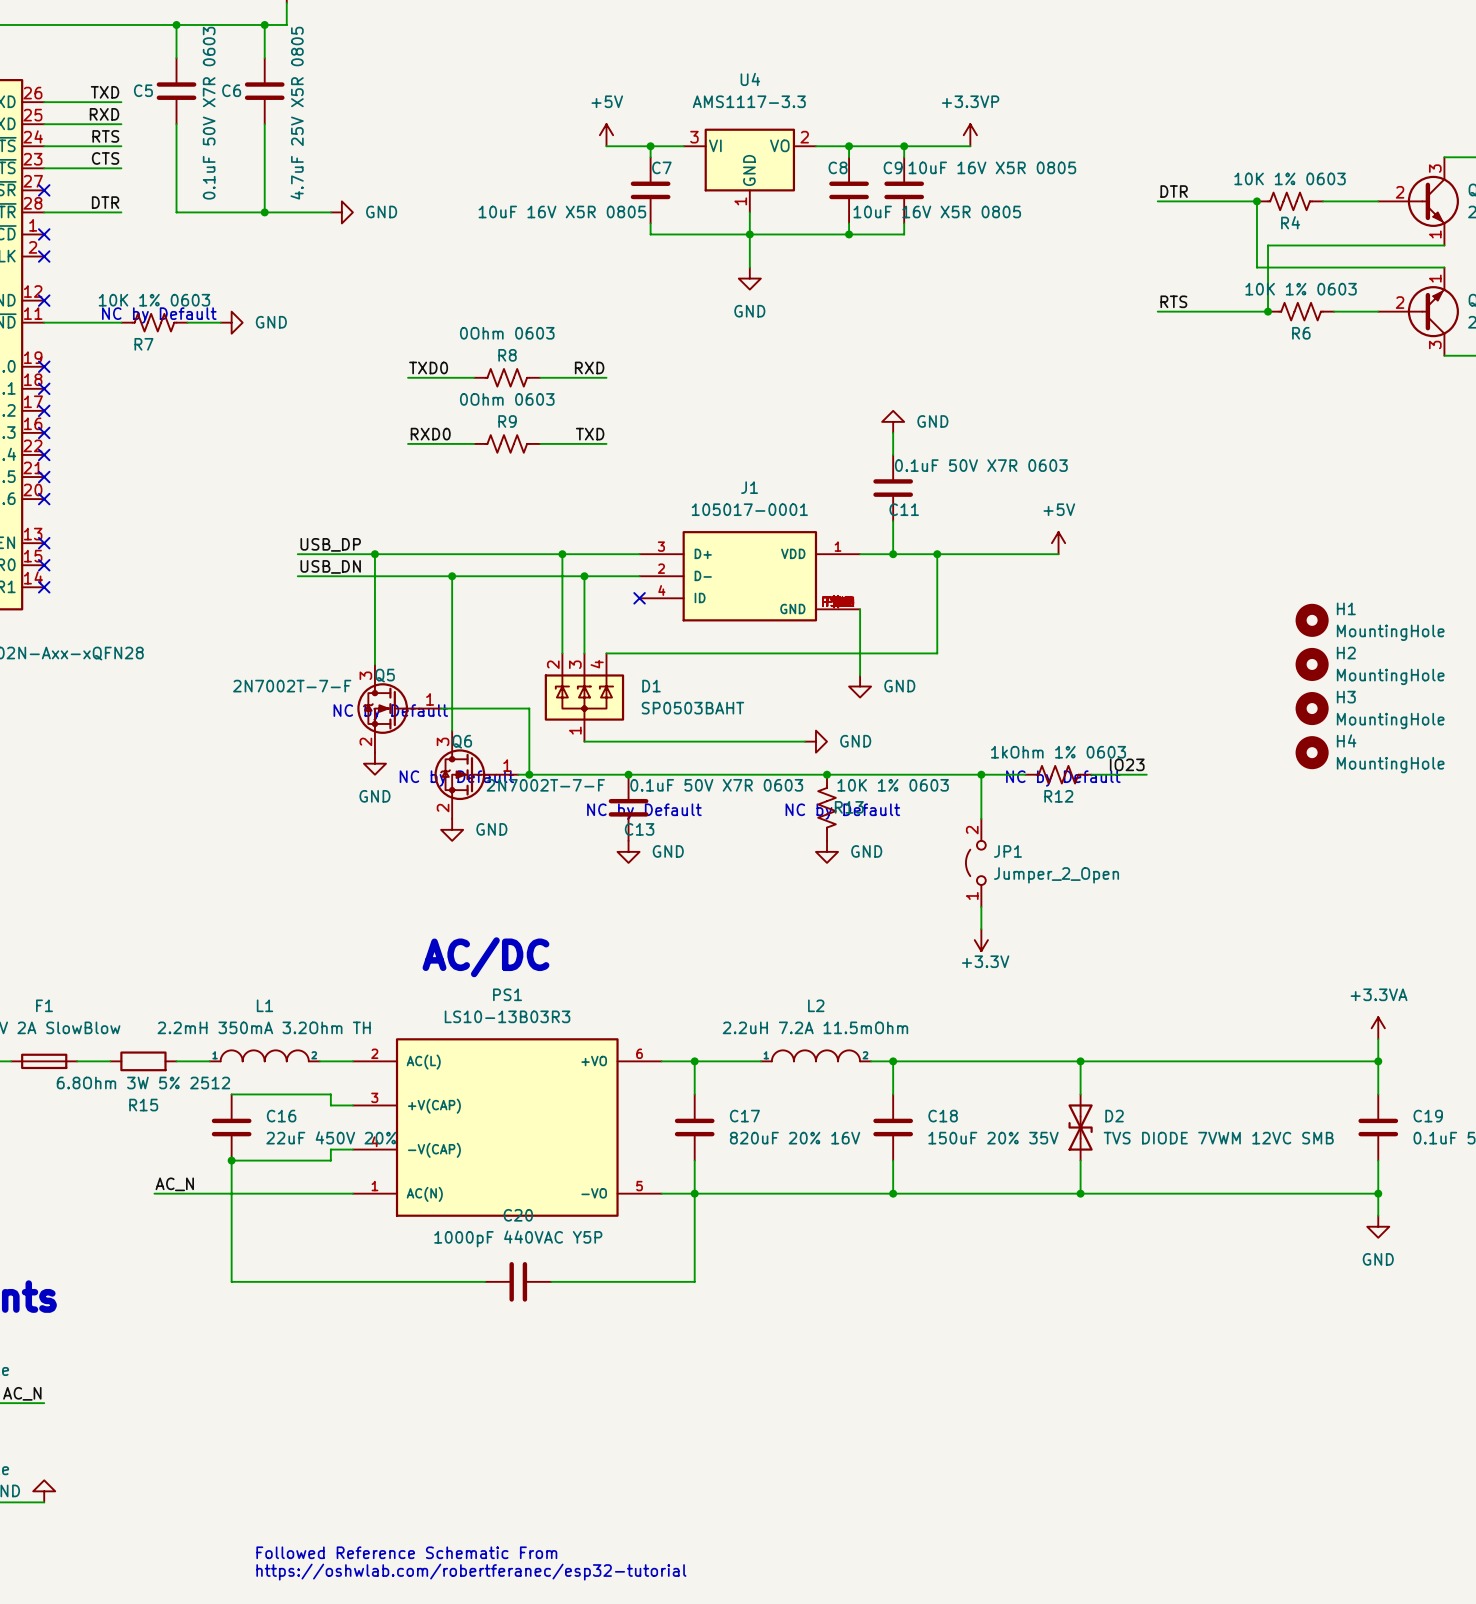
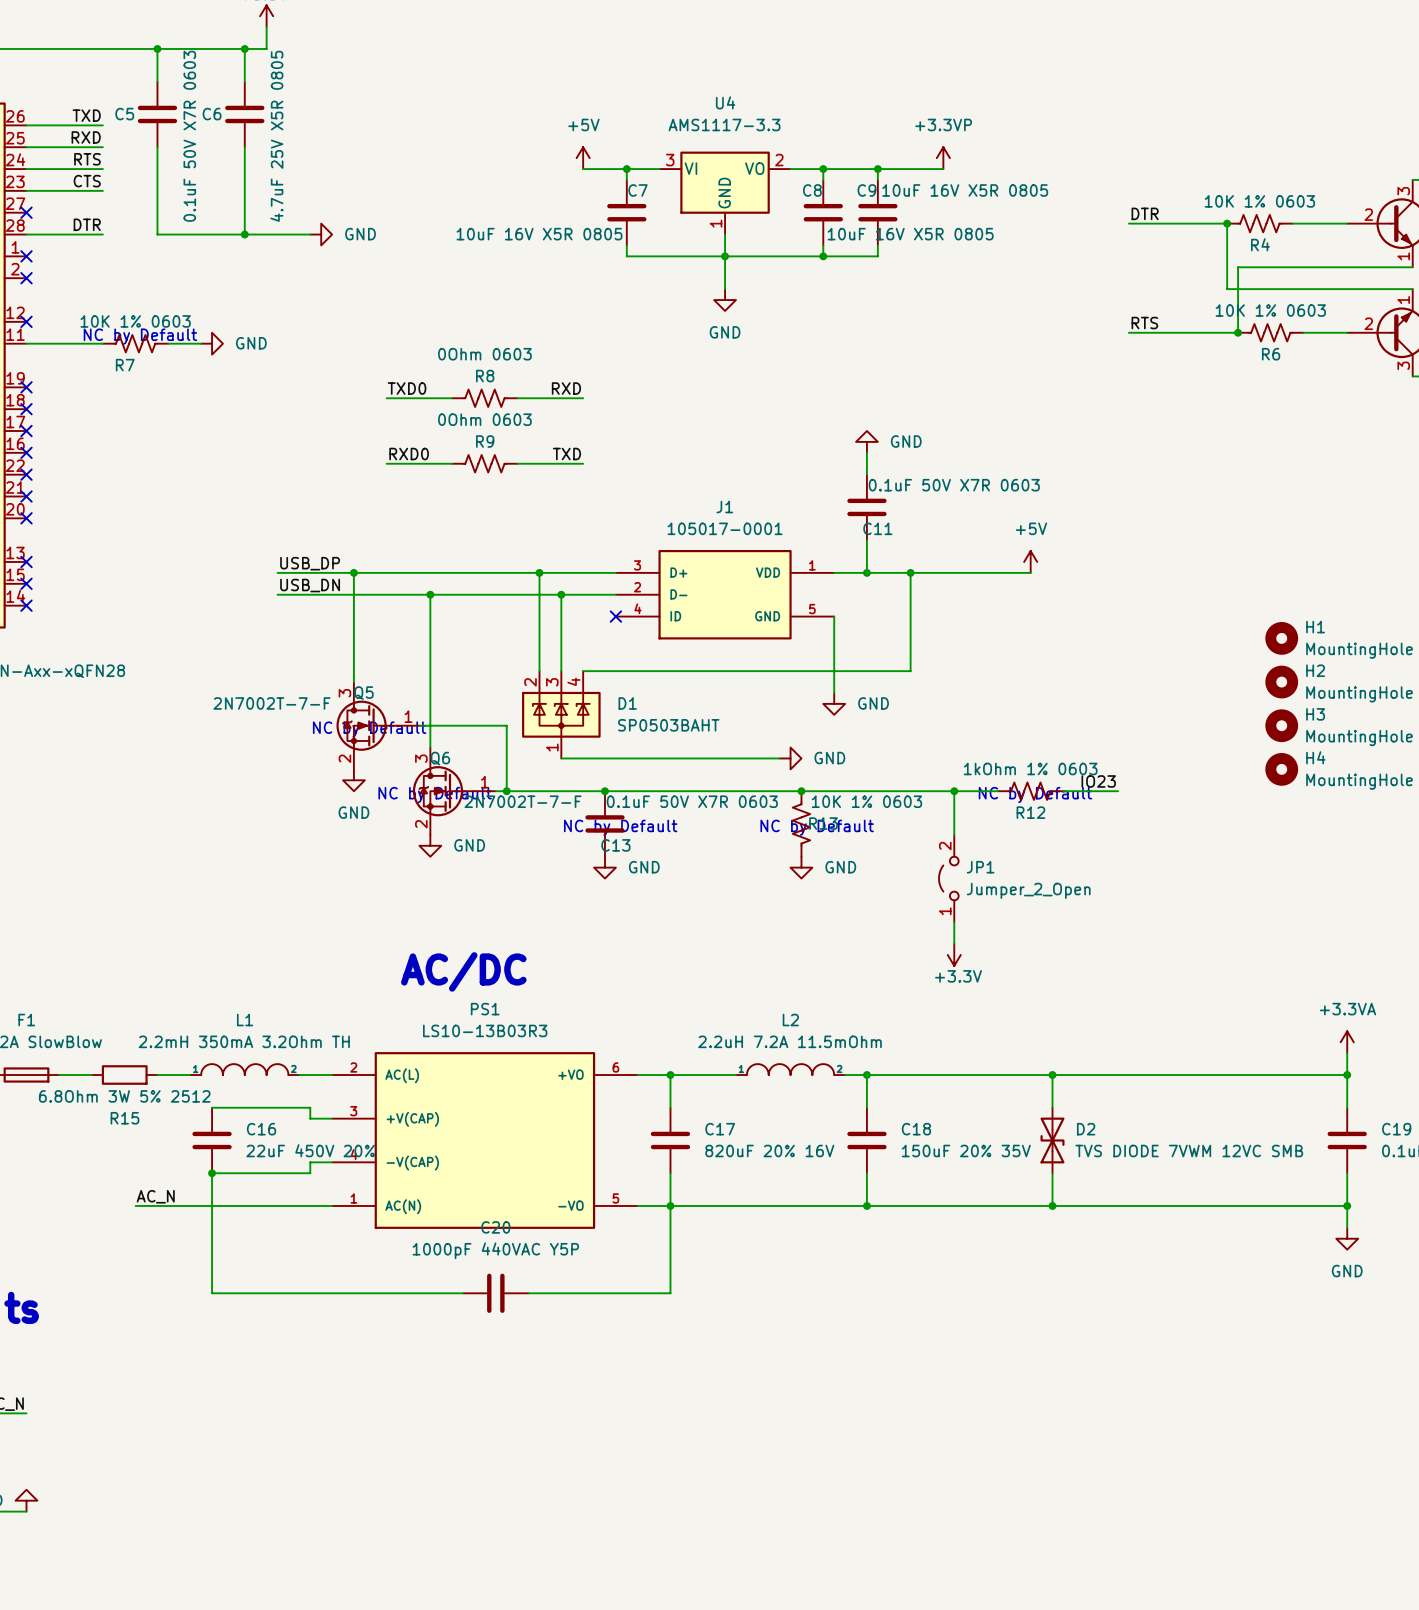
J1 symbol: [639, 531, 861, 622] -> [615, 549, 835, 640]
wire: none -> (834, 616) (834, 627)
text: Followed Reference Schematic From (406, 1552) -> none
text: https://oshwlab.com/robertferanec/esp32-tutorial (471, 1572) -> none

